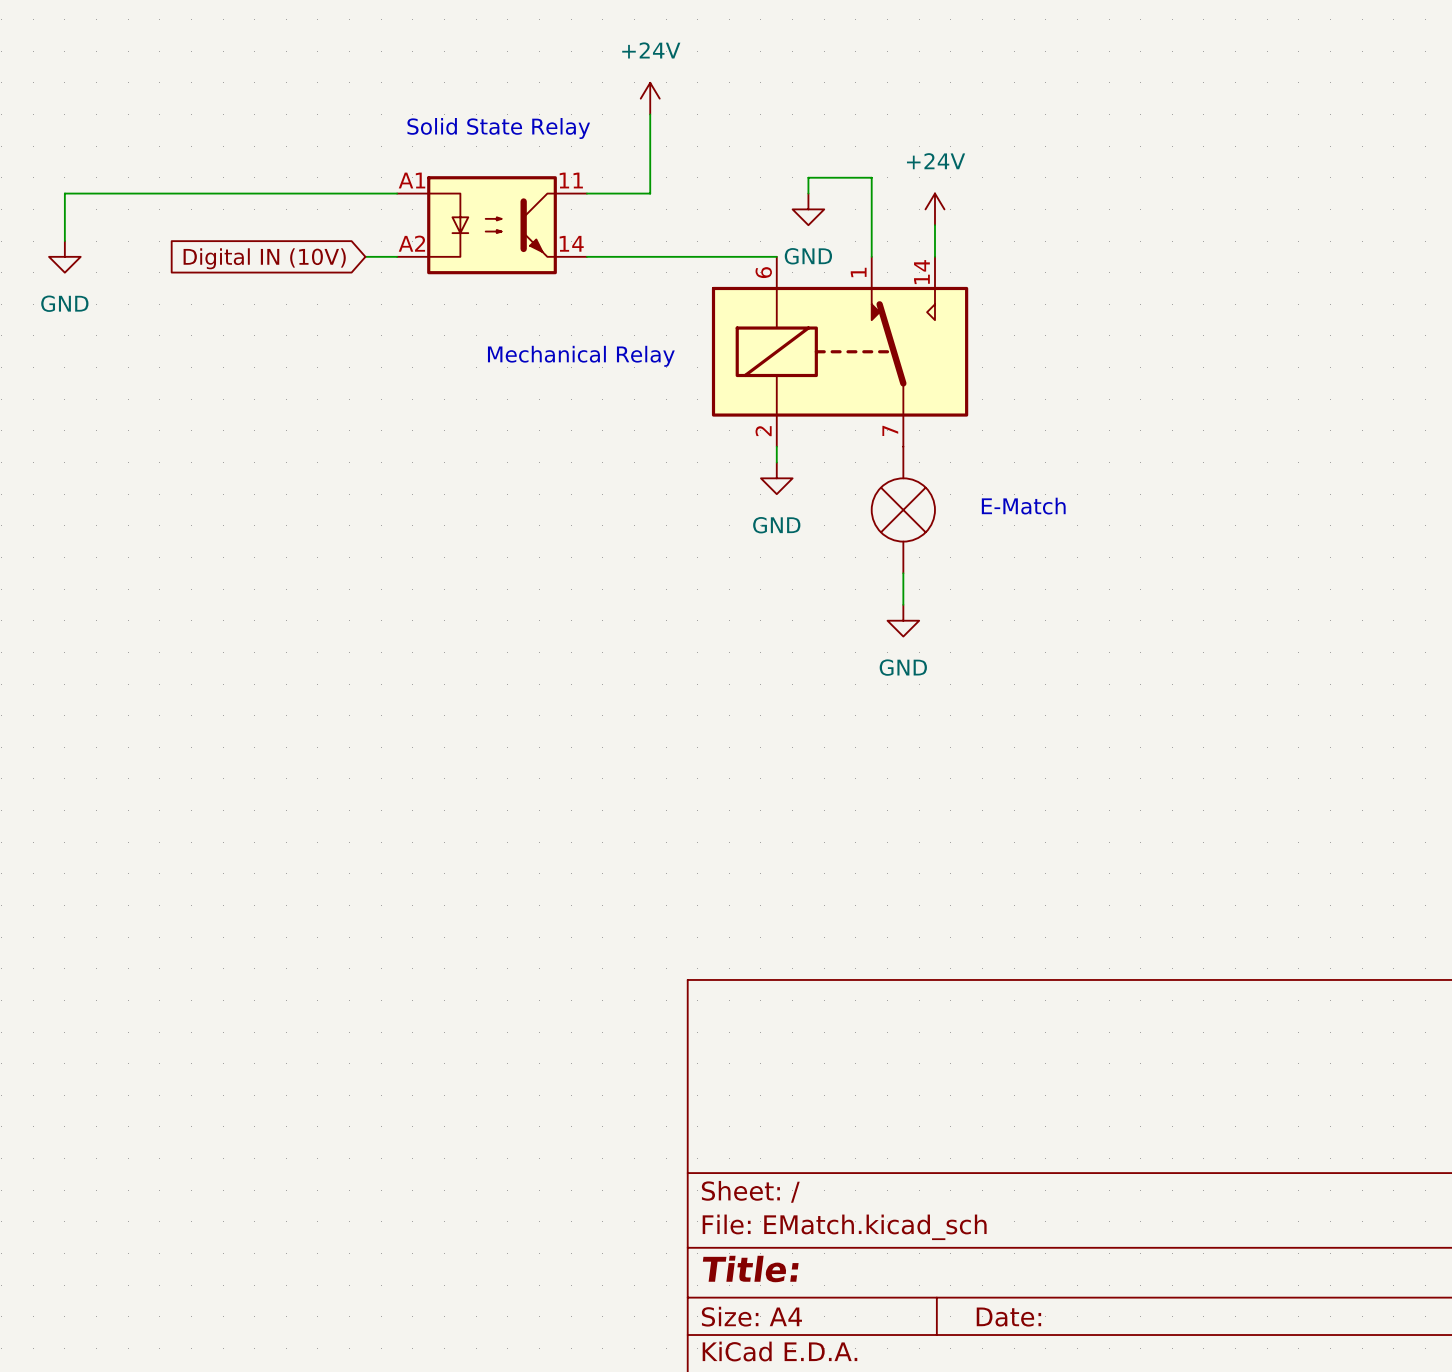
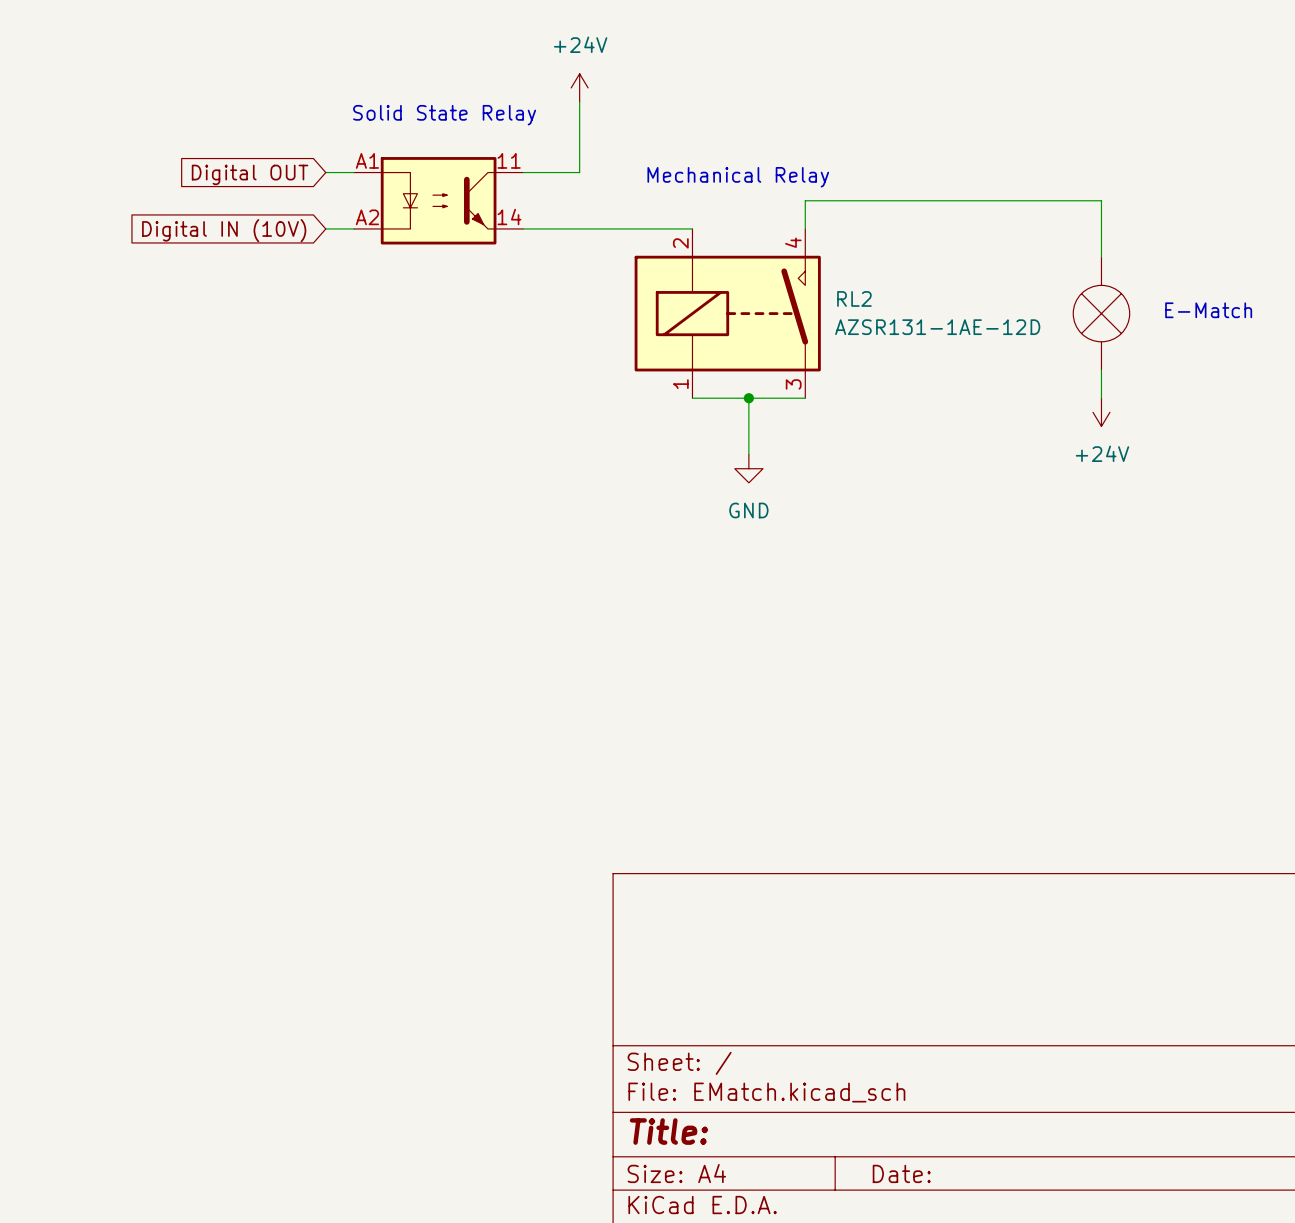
wire: (365, 193) (64, 193) (64, 241) -> none
wire: (808, 193) (808, 177) (871, 177) (871, 256) -> none
global label: none -> Digital OUT (250, 174)
power symbol: GND (808, 209) -> none
power symbol: +24V (934, 209) -> none
wire: (934, 225) (934, 256) -> none
power symbol: GND (64, 256) -> none
wire: none -> (805, 228) (805, 200) (1101, 200) (1101, 257)
text: none -> E-Match (1208, 310)
RL2: none -> AZSR131-1AE-12D (727, 313)
part: (840, 351) -> none
part: none -> (1101, 313)
text position: Mechanical Relay (581, 356) -> Mechanical Relay (738, 177)
wire: none -> (1101, 370) (1101, 398)
wire: (776, 446) (776, 462) -> (692, 398) (805, 398)
wire: none -> (748, 398) (748, 454)
junction: none -> (748, 398)
power symbol: none -> +24V (1101, 412)
power symbol: GND (776, 478) -> none
text: E-Match (1023, 506) -> none
part: (903, 509) -> none
power symbol: none -> GND (748, 468)
wire: (903, 573) (903, 604) -> none
power symbol: GND (903, 620) -> none

